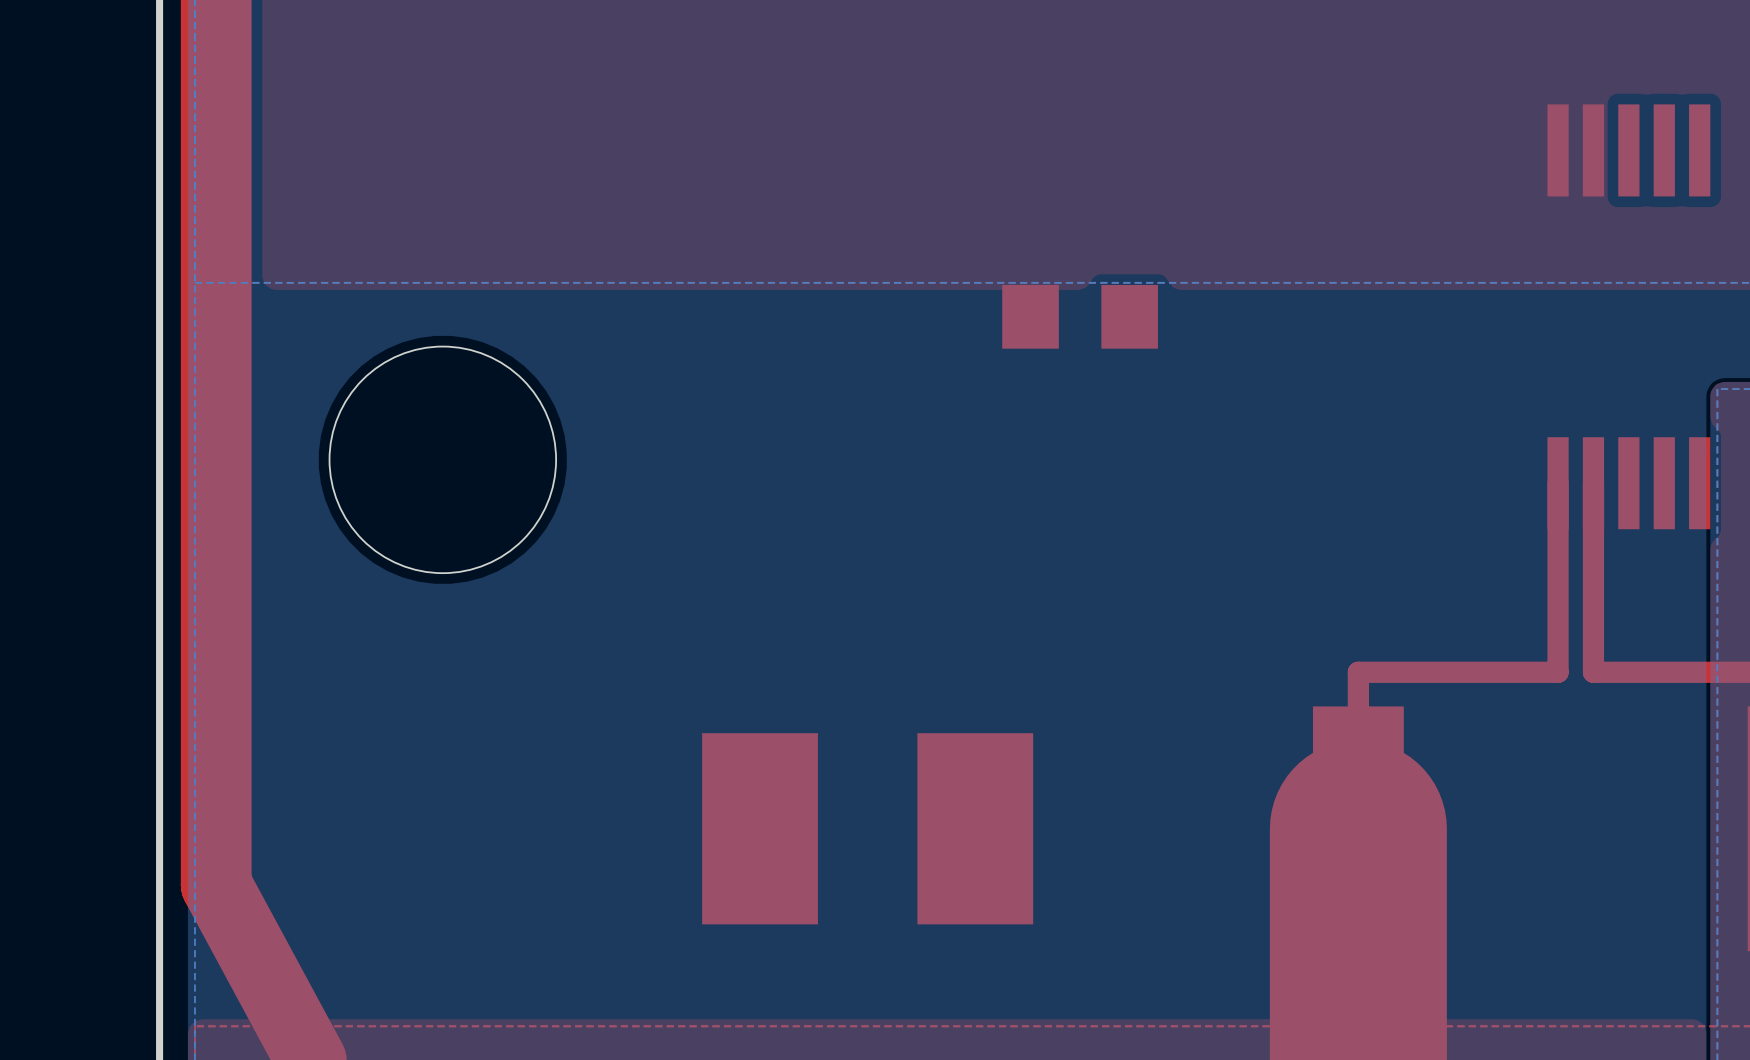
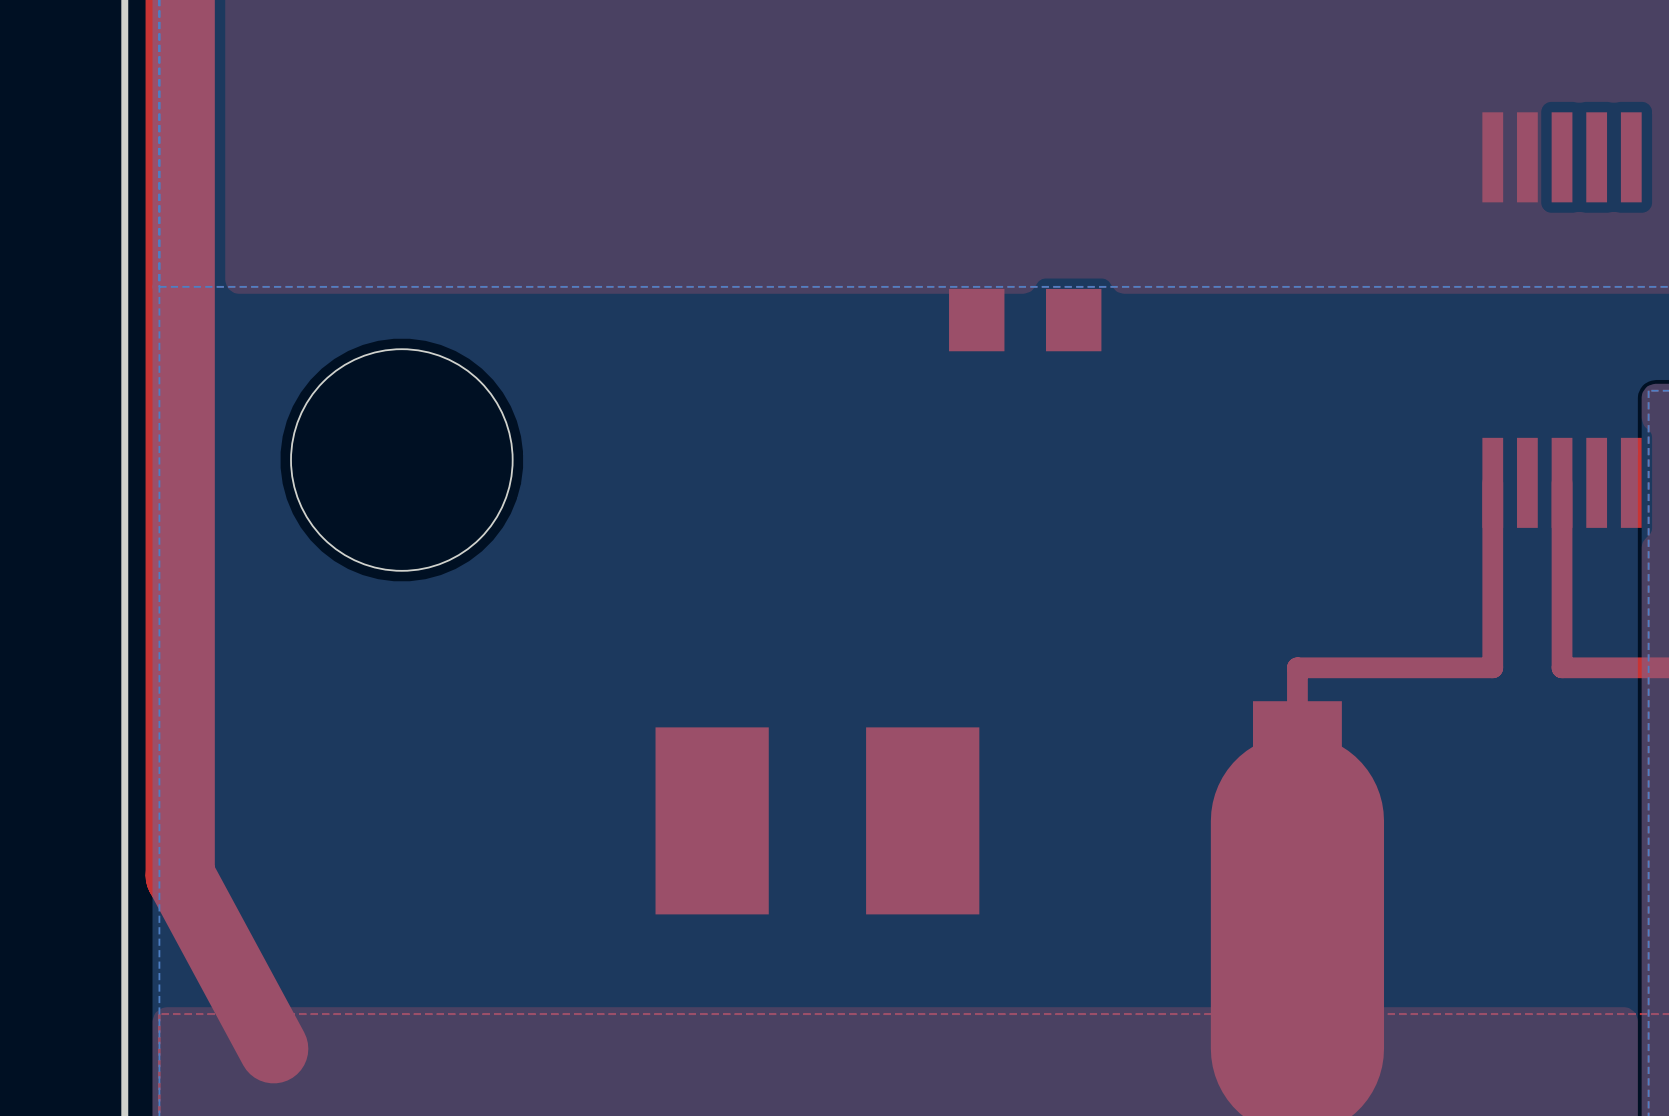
top track: (1593, 483) (1593, 672) (1628, 672) -> (1562, 482) (1562, 667)

